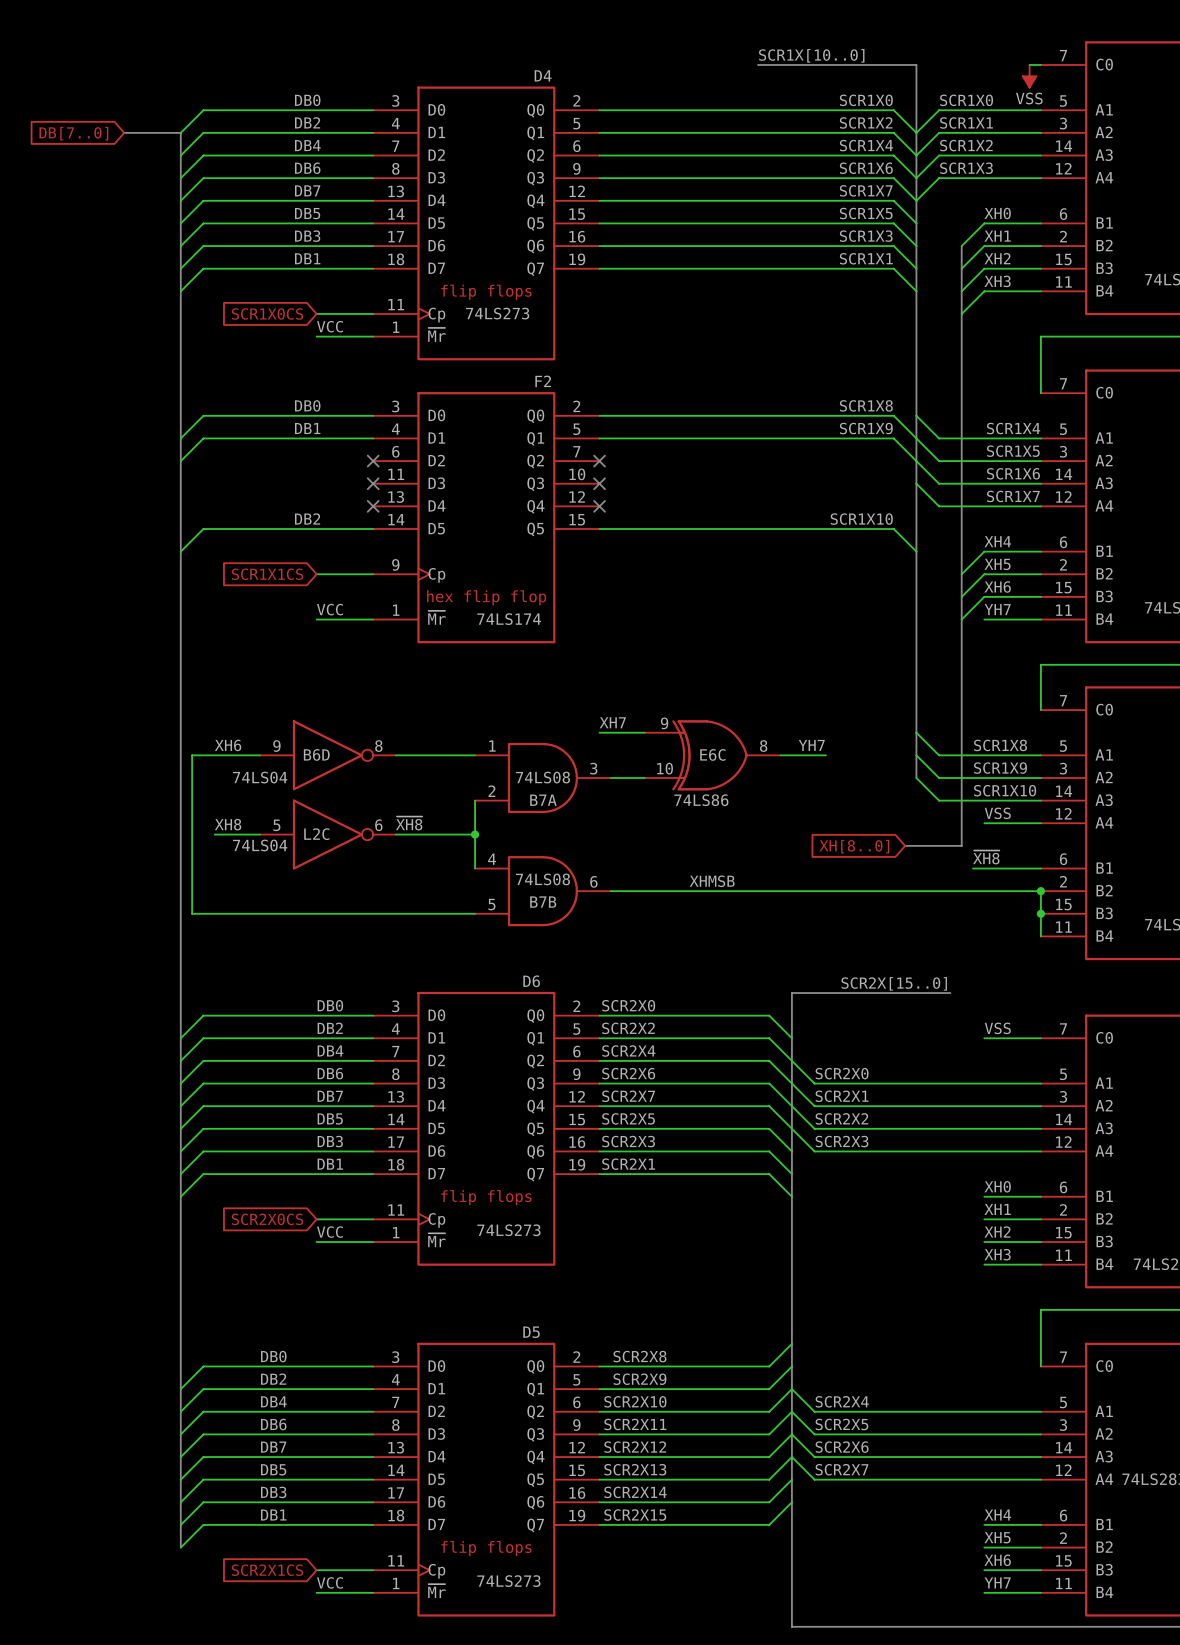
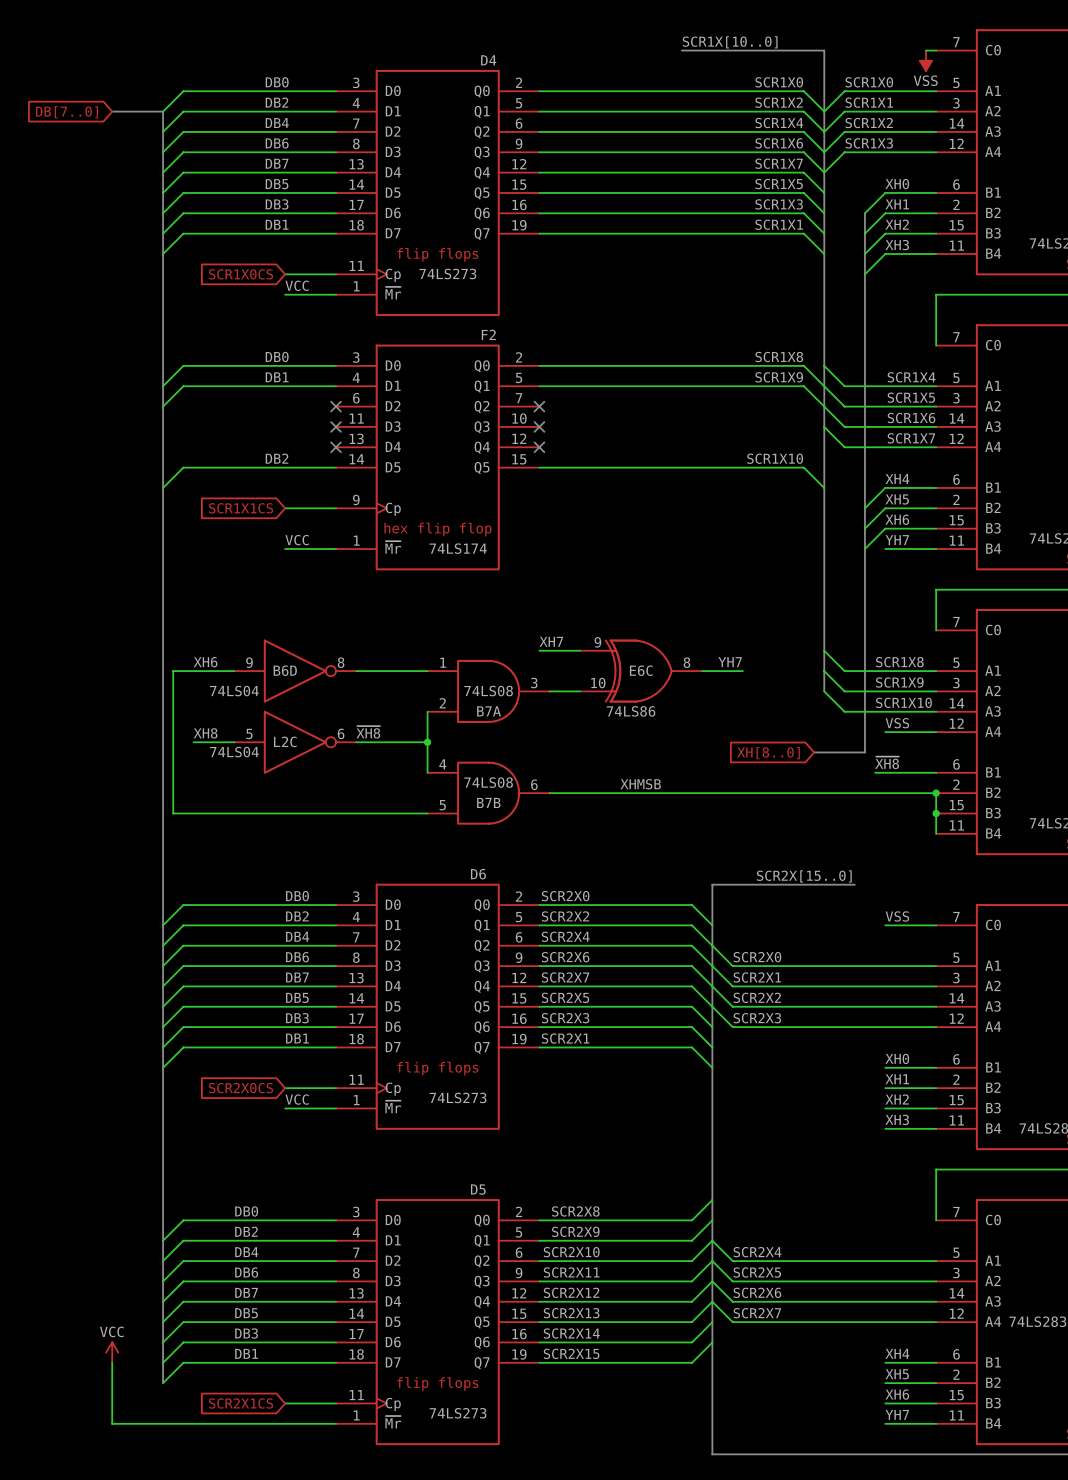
power symbol: none -> VCC (112, 1352)
wire: none -> (112, 1362) (112, 1423) (285, 1423)
label: VCC (329, 1582) -> none

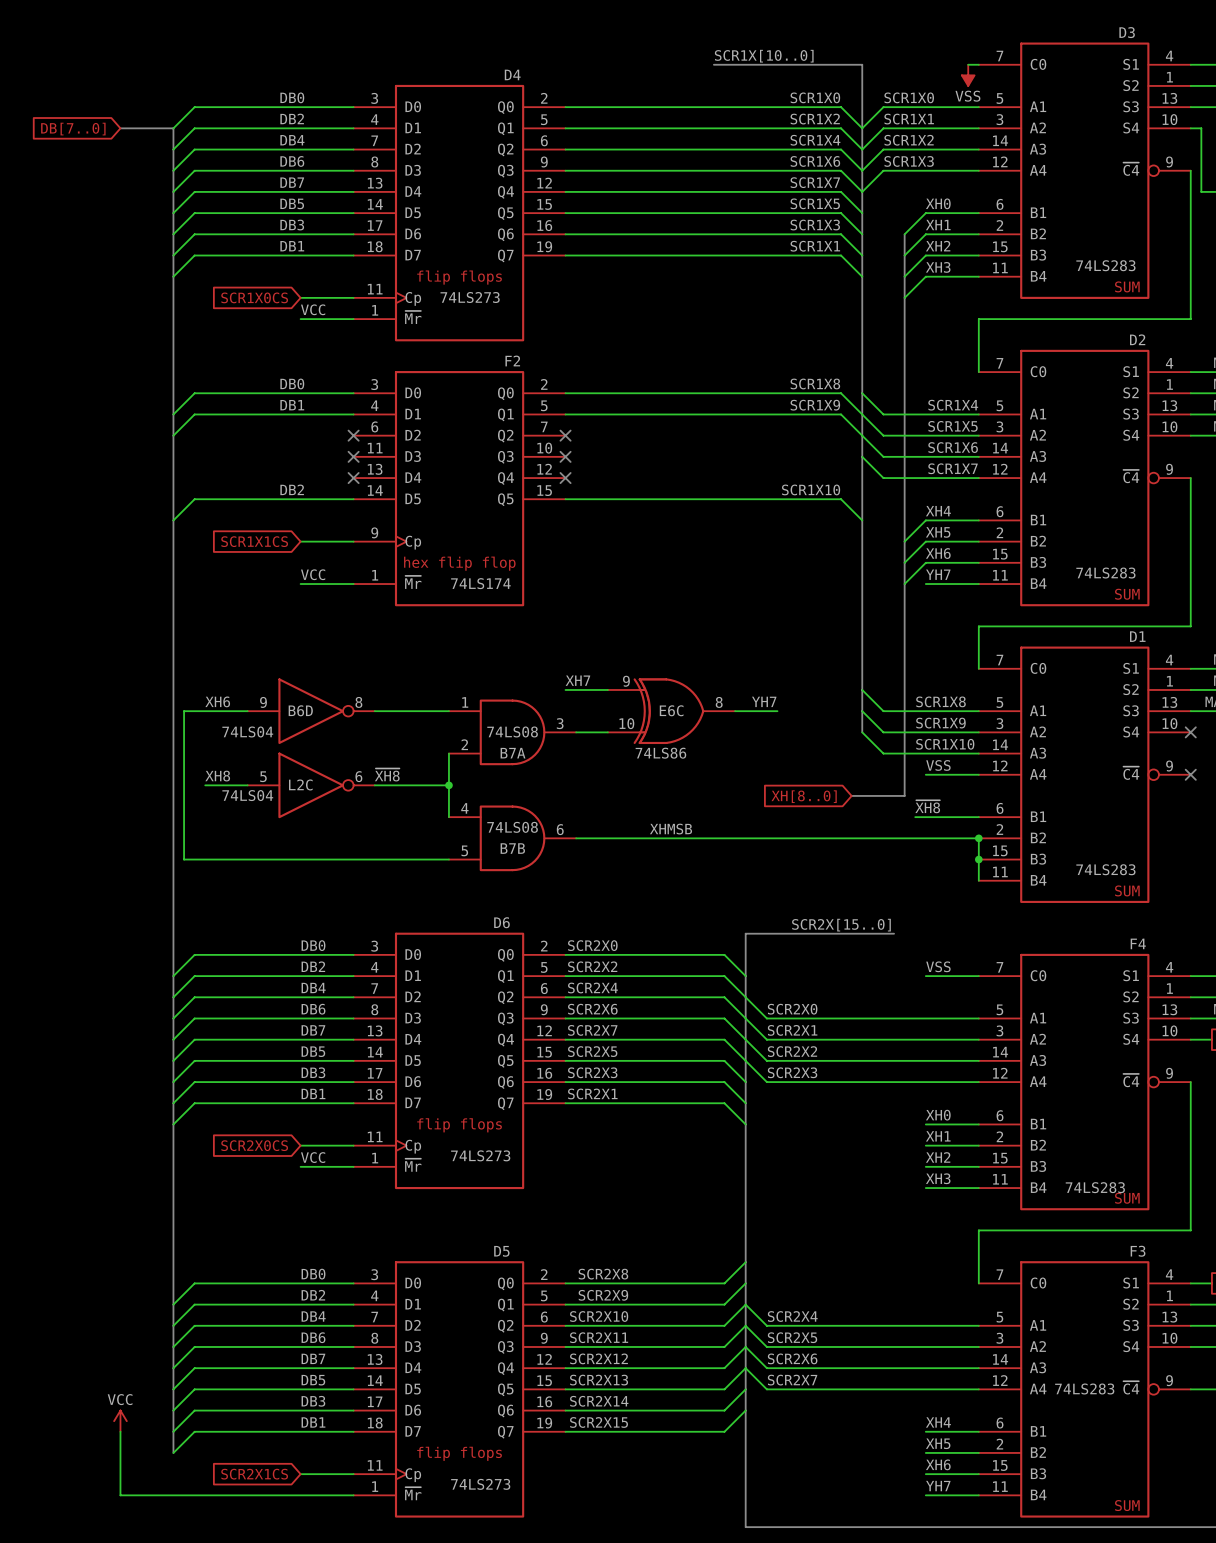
label position: DB0 (246, 1211) -> DB0 (313, 1274)
label position: DB2 (246, 1231) -> DB2 (313, 1295)
label position: DB4 (246, 1252) -> DB4 (313, 1316)
label position: DB6 (246, 1272) -> DB6 (313, 1337)
label position: DB7 (246, 1292) -> DB7 (313, 1358)
label position: DB5 (246, 1313) -> DB5 (313, 1380)
label position: DB3 (246, 1333) -> DB3 (313, 1401)
label position: DB1 (246, 1353) -> DB1 (313, 1422)

